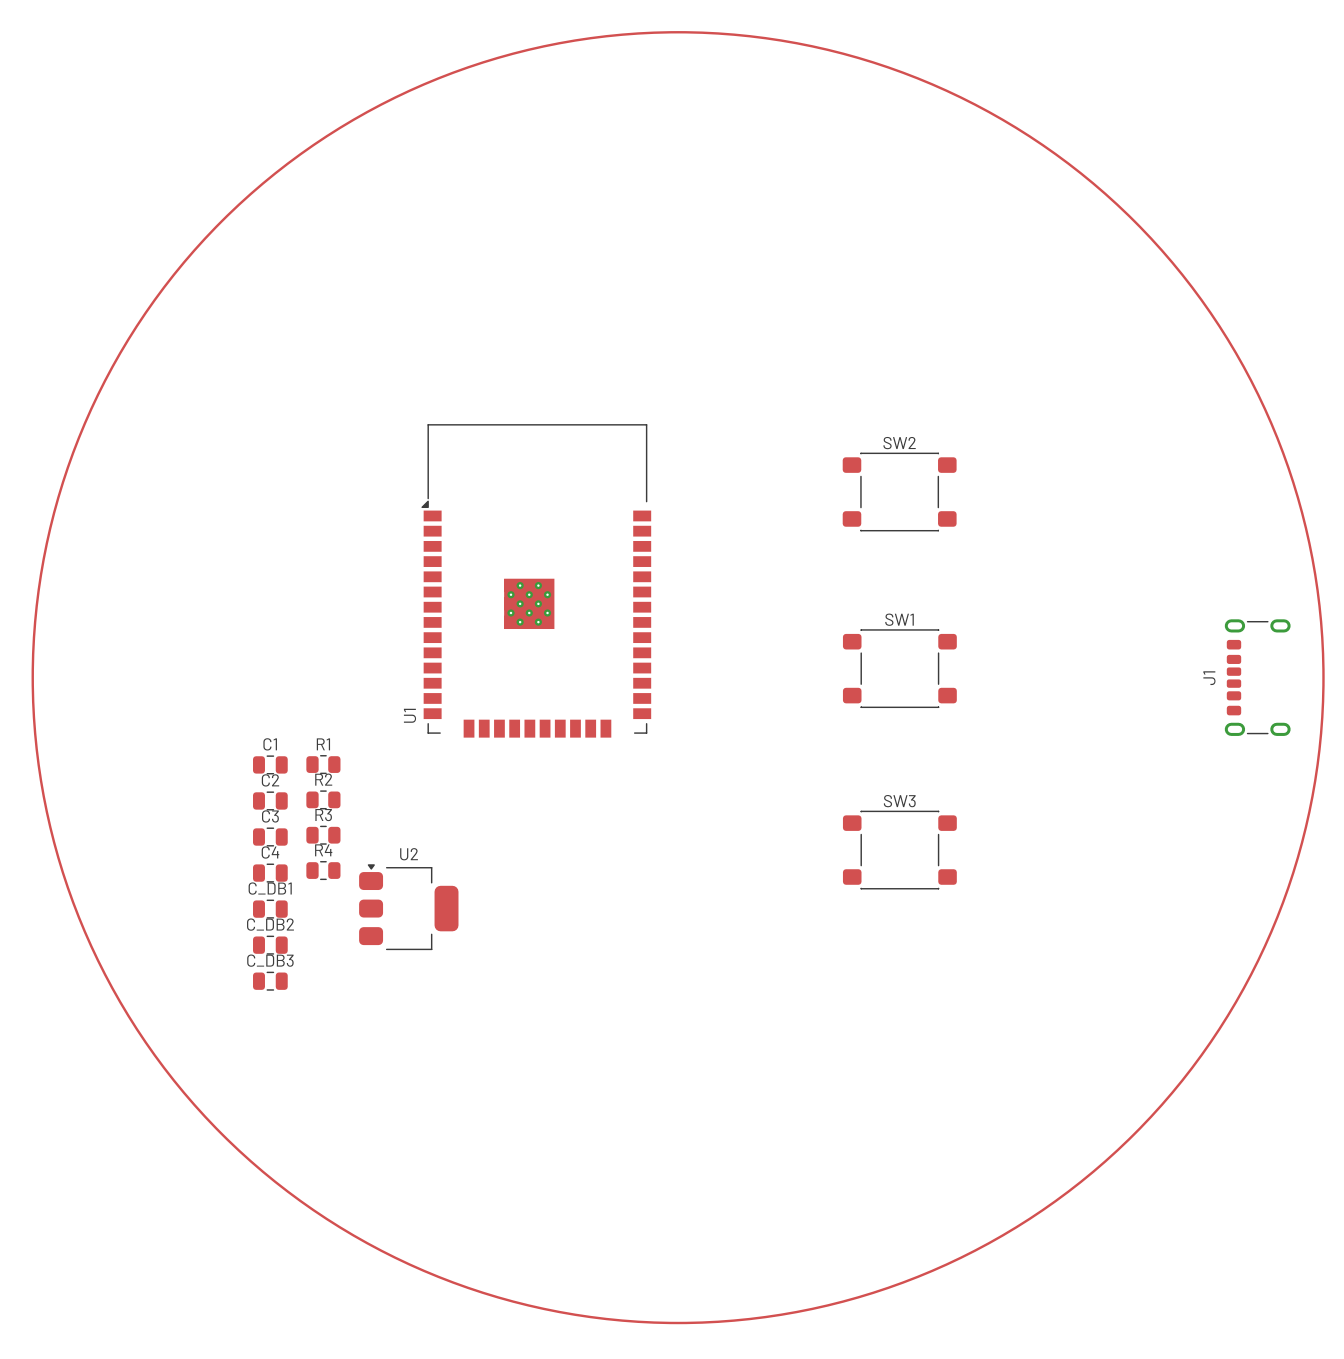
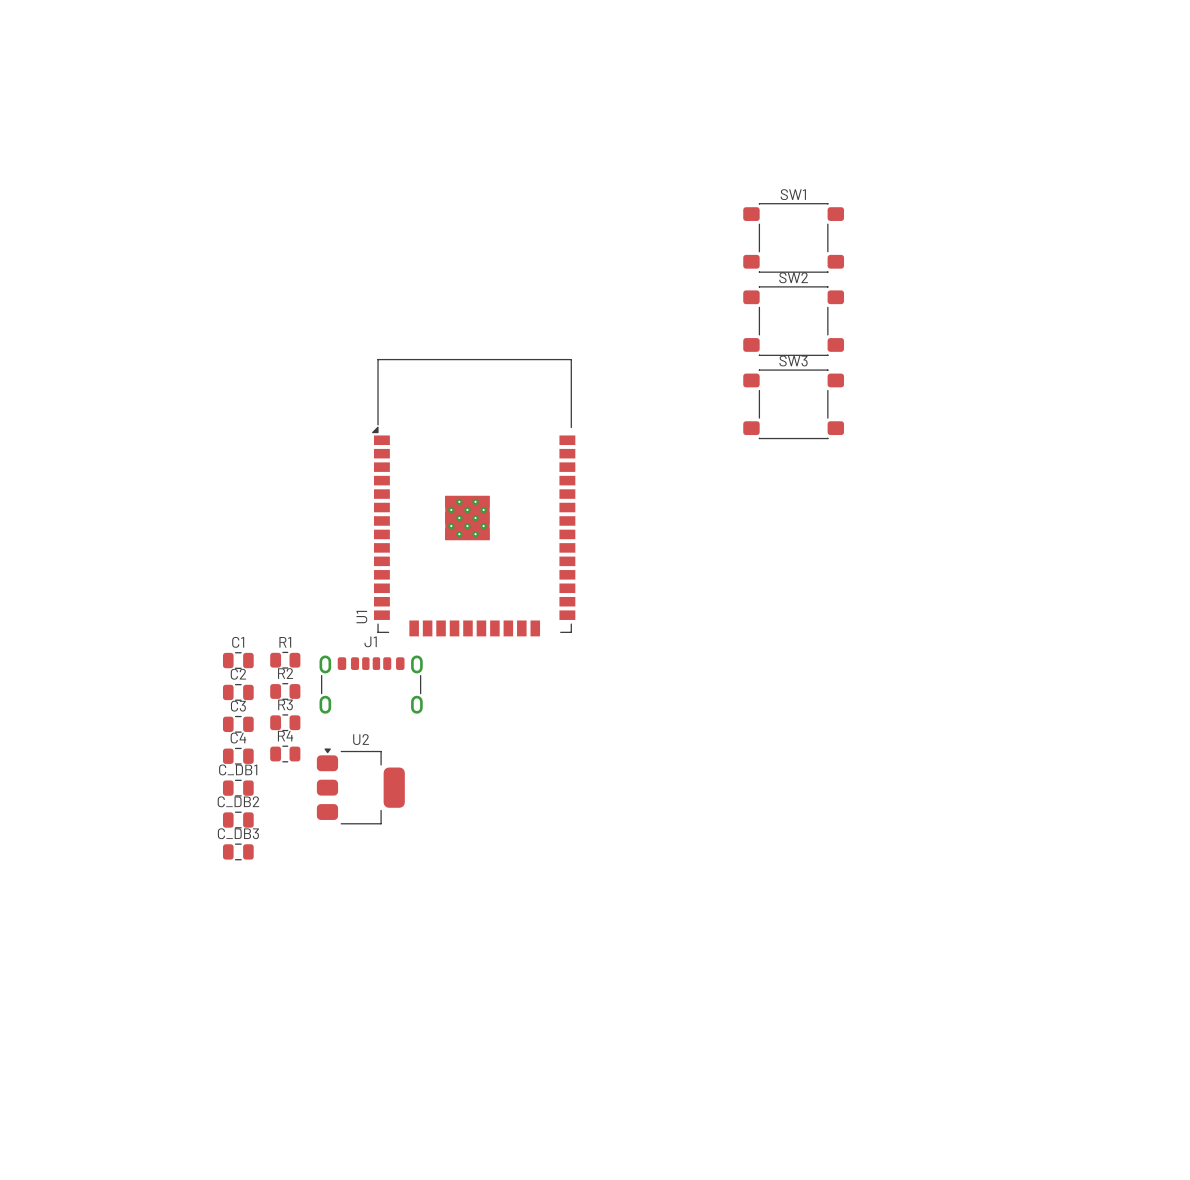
drawing: [31, 31, 1325, 1325] -> none
SW2 position: (899, 492) -> (793, 321)
SW1 position: (899, 668) -> (793, 237)
J1 rotation: 0° (1257, 677) -> 90° clockwise (371, 684)
J1 position: (1257, 677) -> (371, 684)
SW3 position: (899, 850) -> (793, 404)

